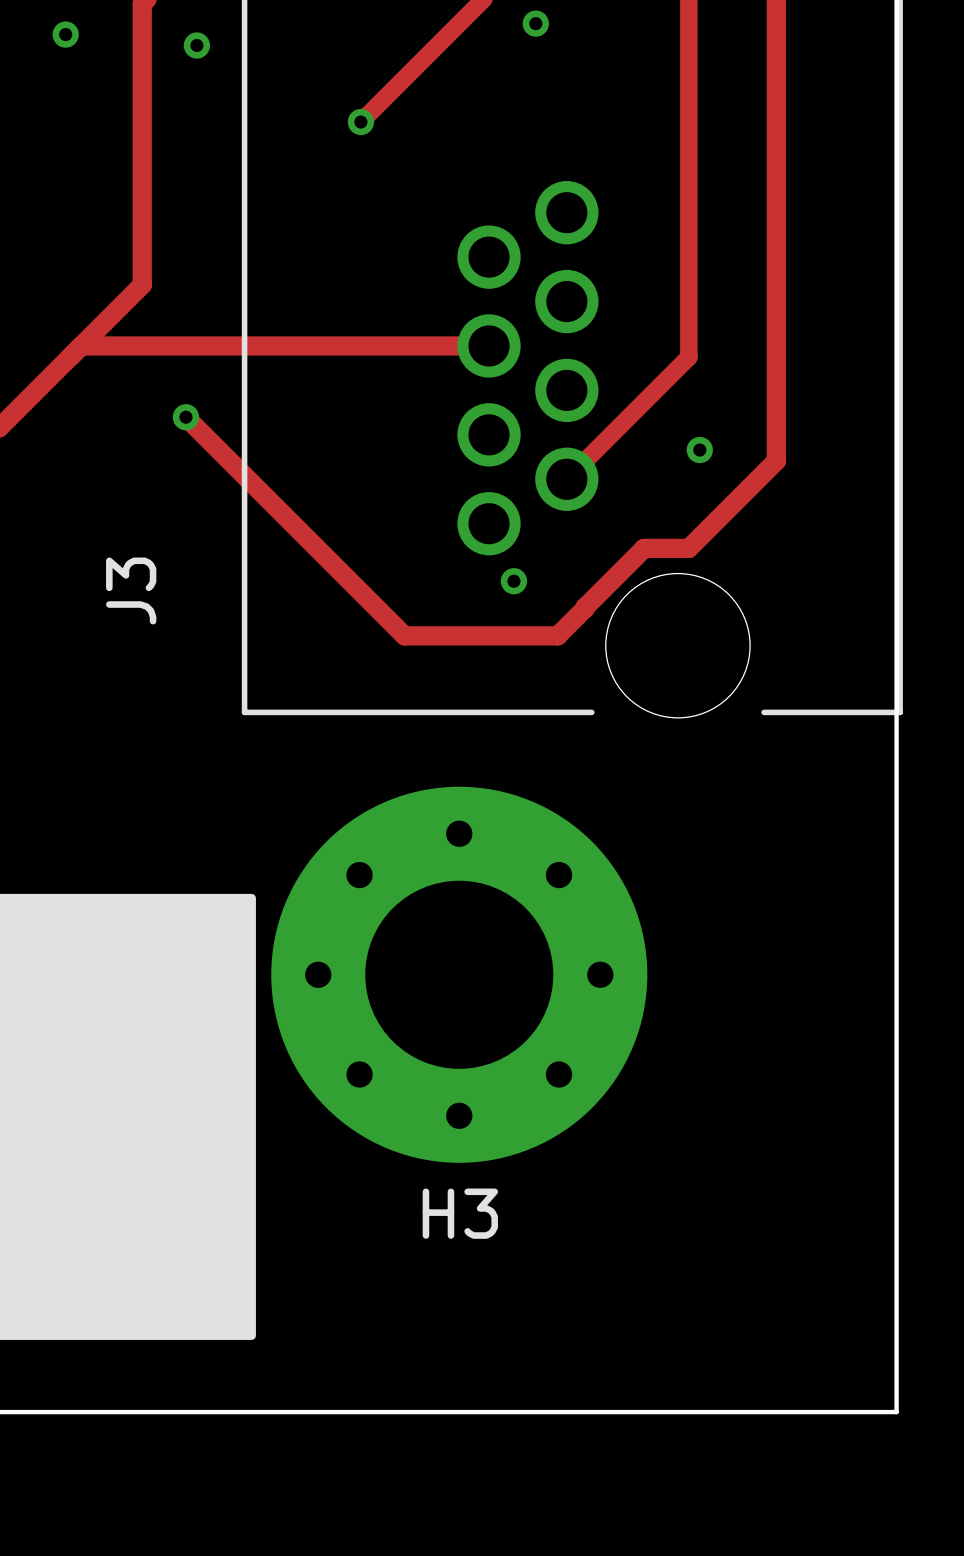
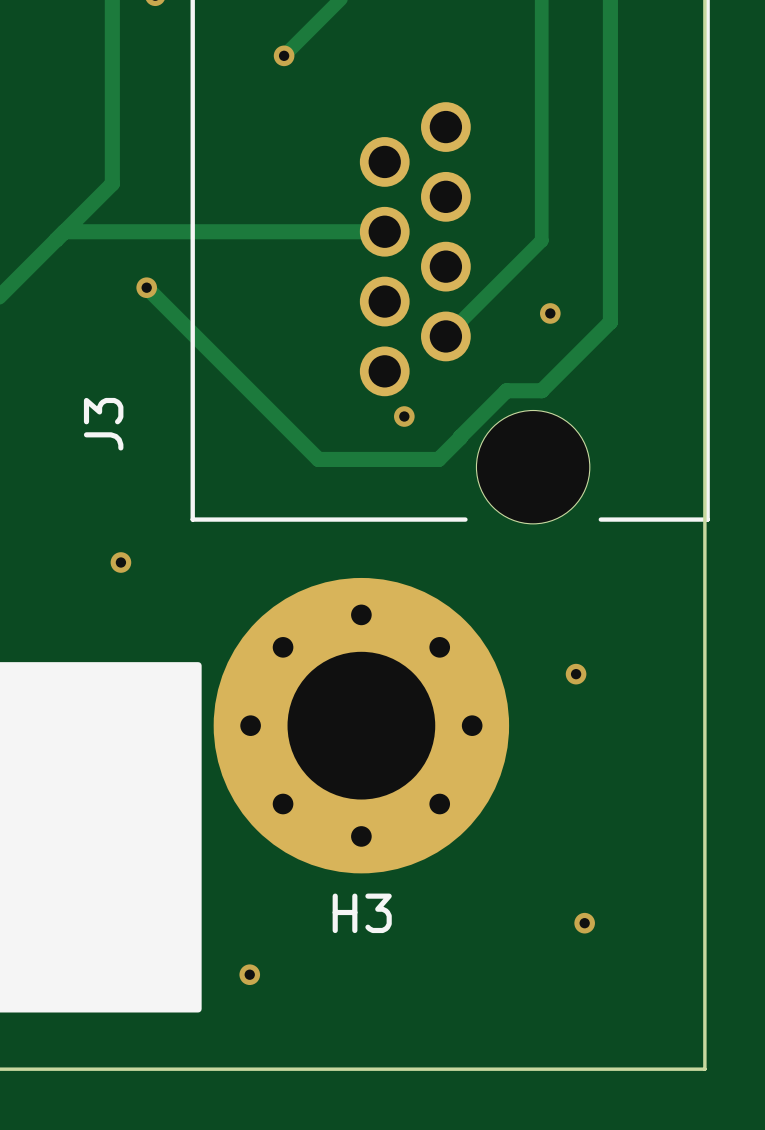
via: none -> (120, 562)
via: none -> (576, 674)
via: none -> (584, 923)
via: none -> (249, 974)

